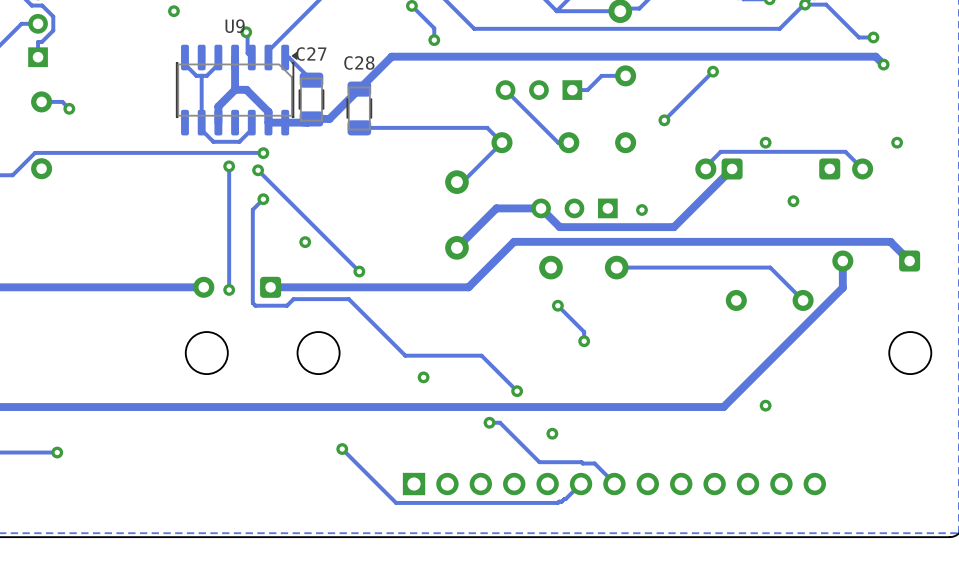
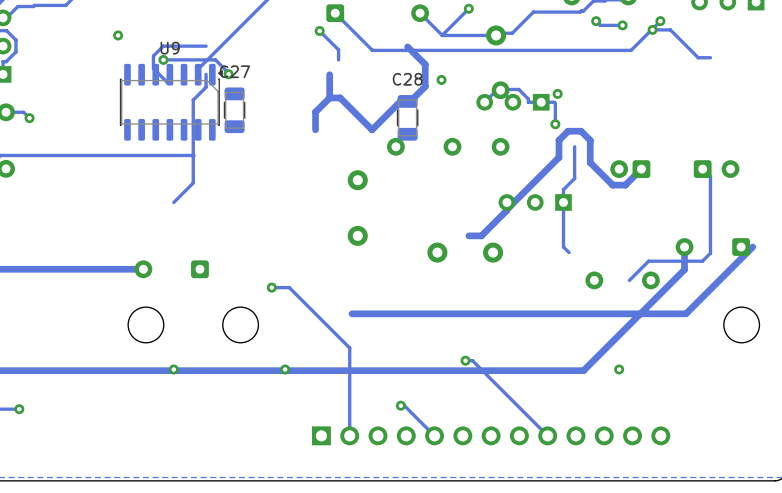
track: none -> (206, 46) (163, 46) (153, 55) (153, 68) (168, 83)
track: none -> (407, 46) (425, 64) (425, 86) (410, 101) (400, 101) (372, 129) (340, 97) (329, 97)
track: (246, 32) (247, 53) (251, 57) -> none
via position: (246, 32) -> (163, 59)
via: (873, 37) -> none
track: none -> (163, 59) (215, 59) (228, 74)
via: (434, 40) -> none
via: none -> (228, 74)
track: (218, 57) (218, 64) (206, 75) (196, 75) (184, 64) (184, 57) -> none
track: (235, 57) (235, 89) -> none
track: none -> (206, 74) (206, 87) (193, 100) (193, 183) (173, 202)
track: (285, 57) (288, 57) (311, 80) -> none
track: none -> (329, 74) (329, 97)
via: none -> (441, 79)
track: (883, 64) (875, 56) (391, 56) (329, 118) (311, 118) (307, 122) (268, 122) (268, 111) (246, 89) (235, 89) -> none
via: (883, 64) -> none
track: (713, 71) (664, 120) -> none
via position: (713, 71) -> (557, 93)
track: (201, 75) (201, 130) (213, 141) (239, 141) (251, 129) (251, 122) -> none
track: (625, 75) (601, 75) (587, 90) (572, 90) -> none
track: none -> (329, 97) (315, 112) (315, 129)
track: (235, 89) (218, 106) (218, 122) -> none
track: (505, 90) (558, 142) (568, 142) -> none
part: (538, 90) -> none
track: none -> (484, 102) (497, 89) (518, 89) (528, 99) (528, 102) (554, 102) (555, 124)
part: none -> (512, 102)
C28 position: (359, 108) -> (407, 117)
via: none -> (555, 124)
via: (664, 120) -> none
track: (359, 127) (487, 127) (502, 142) (462, 182) (456, 182) -> none
track: none -> (574, 146) (574, 178) (563, 189) (563, 247) (569, 252)
via: (765, 142) -> none
via: (897, 142) -> none
via: (263, 153) -> none
track: (229, 166) (229, 289) -> none
via: (229, 166) -> none
part position: (718, 168) -> (630, 169)
track: (732, 168) (673, 227) (559, 227) (541, 208) (496, 208) (456, 247) -> none
track: none -> (641, 169) (625, 185) (612, 185) (590, 162) (590, 140) (581, 131) (568, 131) (558, 140) (558, 157) (506, 209)
part position: (846, 168) -> (716, 169)
track: (862, 168) (845, 151) (720, 151) (705, 168) -> none
track: none -> (702, 169) (710, 176) (710, 253) (702, 261) (648, 261) (629, 280)
track: (258, 170) (359, 271) -> none
via: (258, 170) -> none
track: (263, 199) (252, 209) (252, 303) (255, 305) (287, 305) (293, 299) (348, 299) (405, 355) (481, 355) (517, 391) -> none
via: (263, 199) -> none
via: (793, 201) -> none
part: (574, 208) -> none
track: none -> (506, 202) (506, 210) (481, 235) (468, 235)
part: none -> (535, 202)
via: (641, 210) -> none
via: (305, 242) -> none
track: (909, 261) (890, 241) (514, 241) (468, 287) (270, 287) -> none
track: none -> (752, 247) (685, 313) (351, 313)
track: (616, 267) (770, 267) (803, 300) -> none
via position: (359, 271) -> (271, 287)
via: (229, 289) -> none
track: (557, 305) (584, 332) (584, 341) -> none
via: (557, 305) -> none
track: none -> (271, 287) (289, 287) (349, 348) (349, 435)
via: (584, 341) -> none
via: (423, 377) -> none
via: (517, 391) -> none
track: none -> (465, 360) (472, 360) (547, 435)
via: none -> (465, 360)
via: none -> (173, 369)
via: none -> (285, 369)
track: (489, 422) (500, 422) (539, 462) (594, 463) (614, 484) -> none
via: (489, 422) -> none
via: (552, 433) -> none
track: none -> (400, 405) (404, 405) (434, 435)
via: none -> (400, 405)
track: (342, 449) (396, 502) (557, 502) (565, 499) (581, 484) -> none
via: (342, 449) -> none

